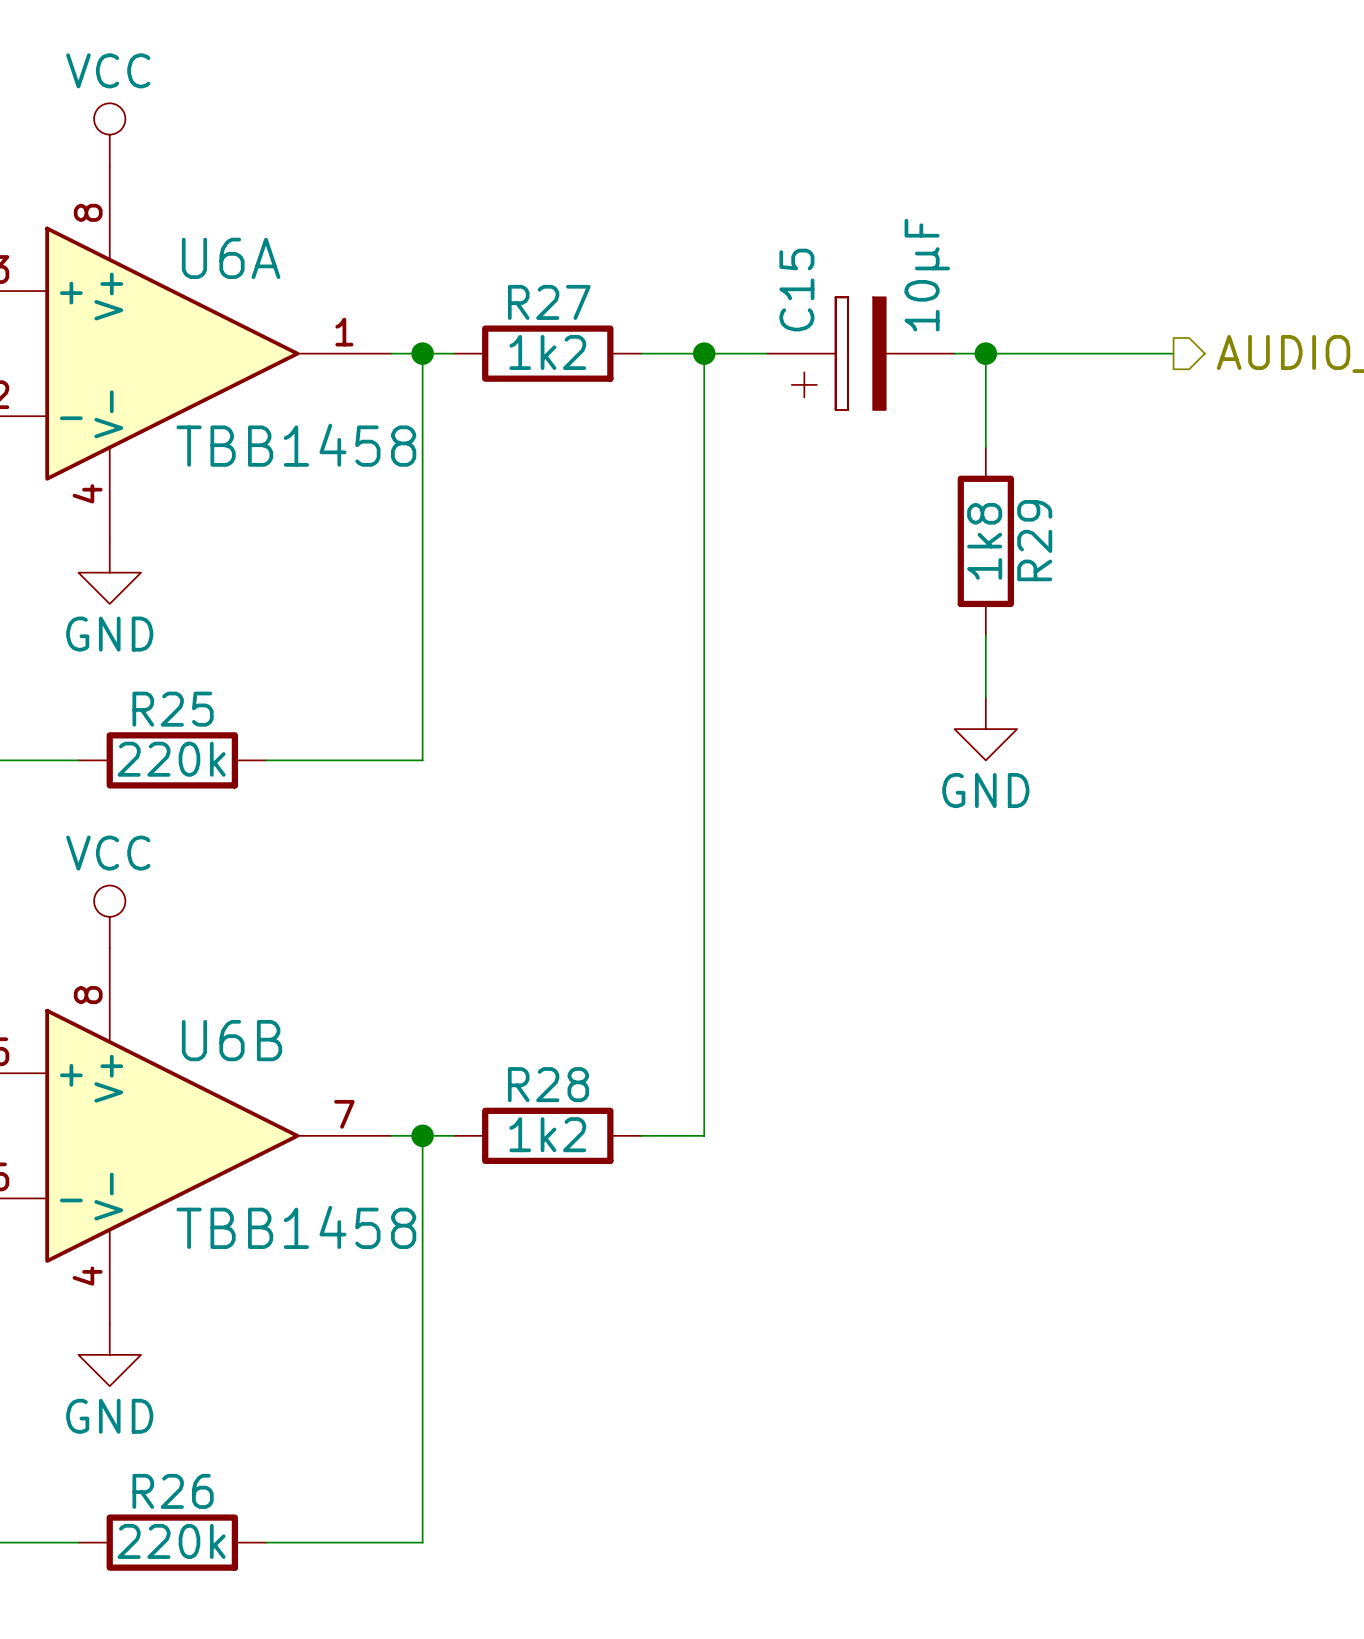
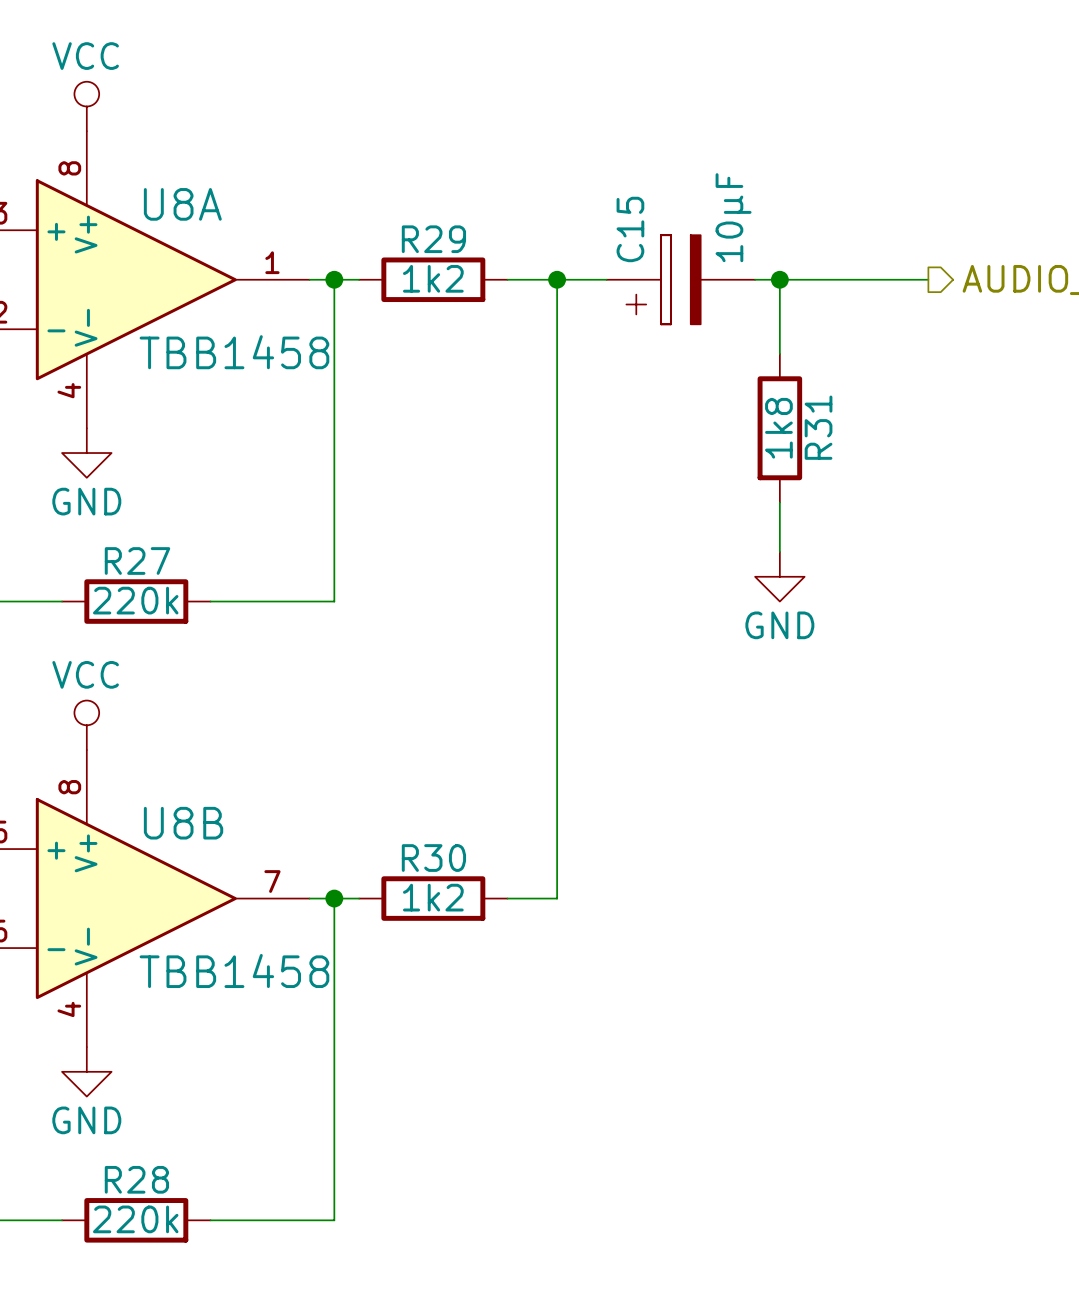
U6A name: U6A (231, 258) -> U8A (182, 204)
R27 name: R27 (549, 302) -> R29 (433, 239)
R29 name: R29 (1034, 540) -> R31 (818, 427)
R25 name: R25 (173, 709) -> R27 (137, 561)
U6B name: U6B (232, 1040) -> U8B (183, 823)
R28 name: R28 (548, 1084) -> R30 (433, 858)
R26 name: R26 (173, 1491) -> R28 (136, 1179)

